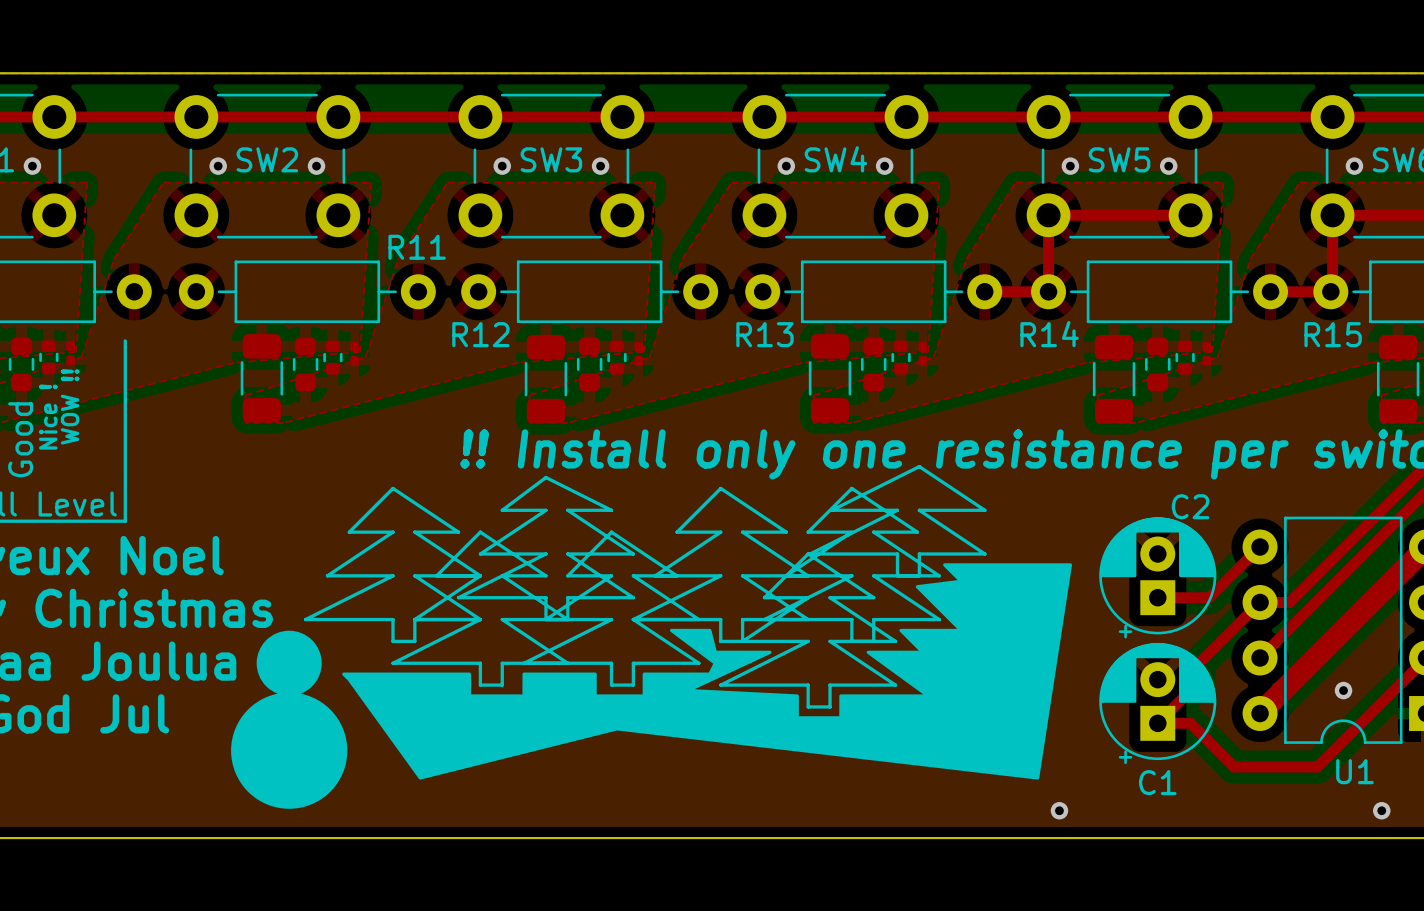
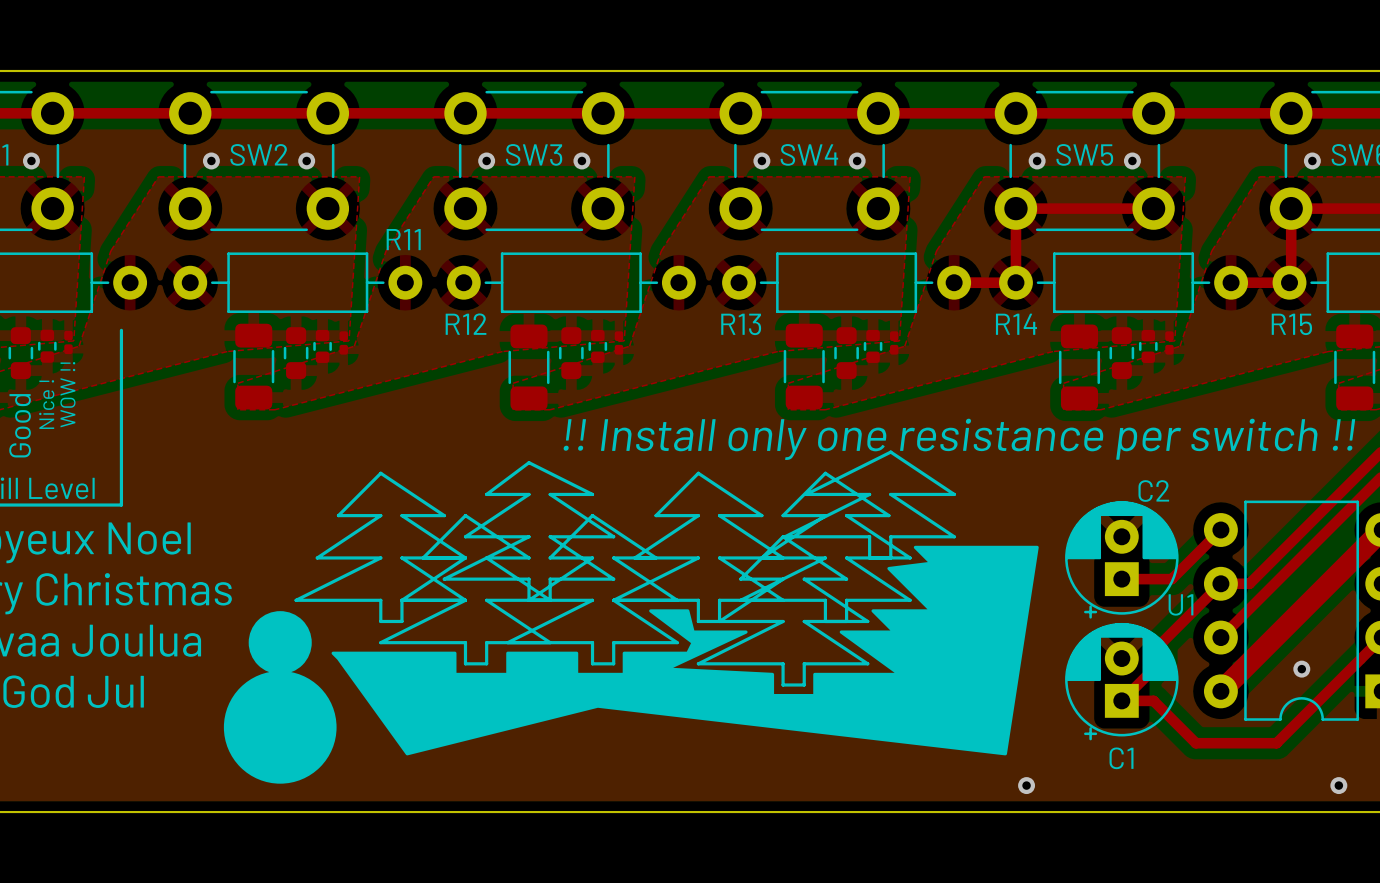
U1 name position: U1 (1354, 771) -> U1 (1181, 604)

